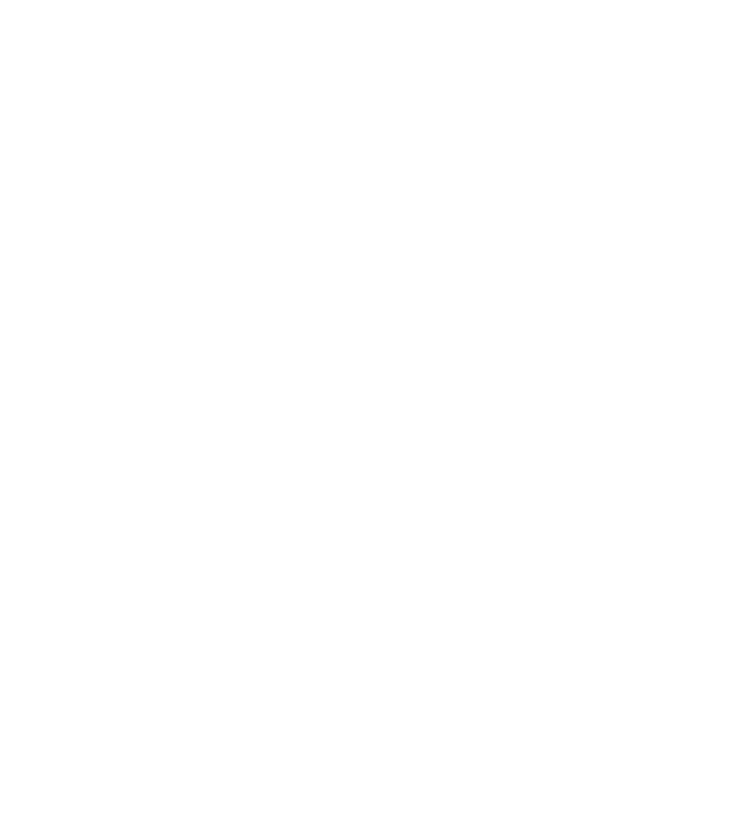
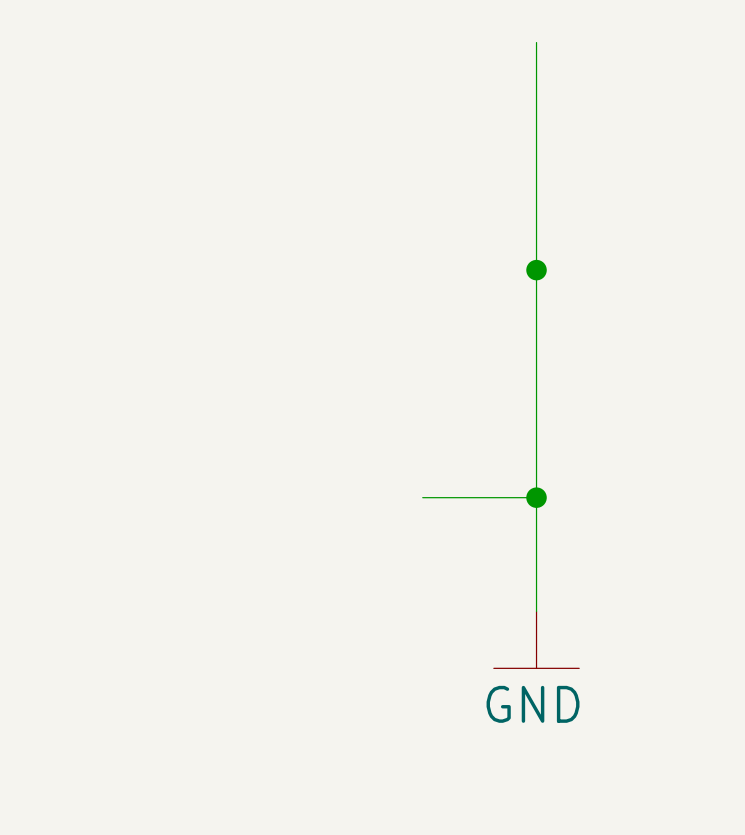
wire: none -> (536, 42) (536, 611)
junction: none -> (536, 270)
wire: none -> (422, 497) (536, 497)
junction: none -> (536, 497)
power symbol: none -> GND (536, 639)

